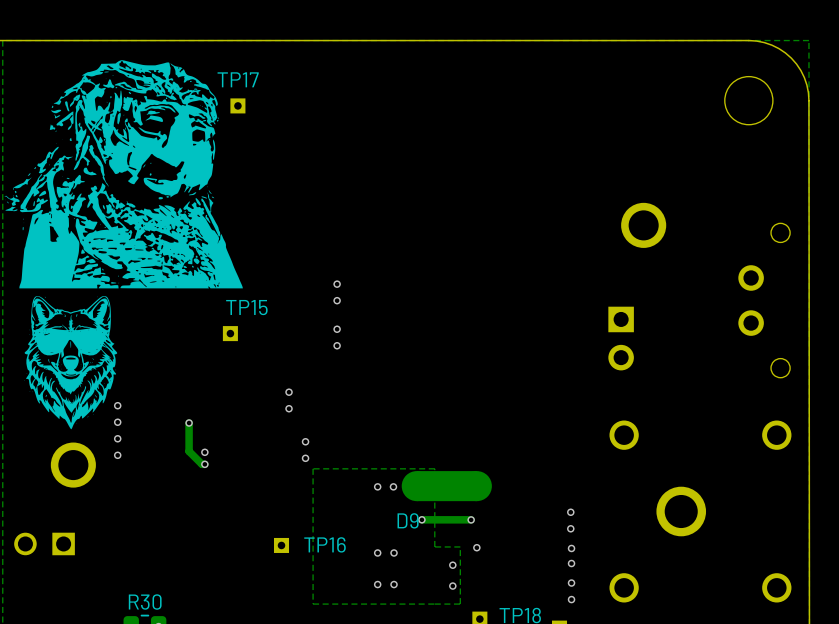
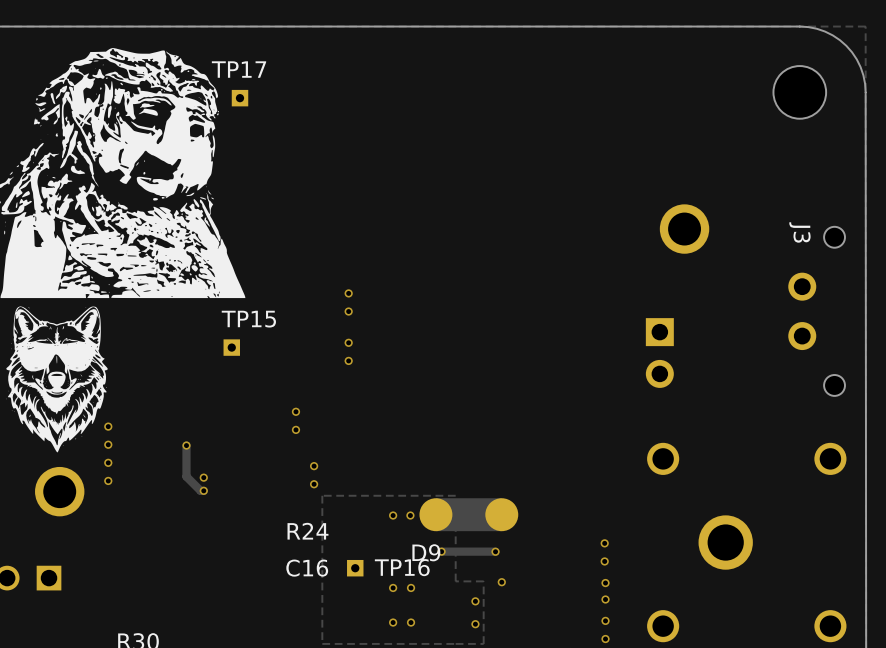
J3 name: none -> J3 (799, 232)
R24: none -> (307, 531)
C16: none -> (307, 568)
TP16 position: (281, 545) -> (355, 568)

